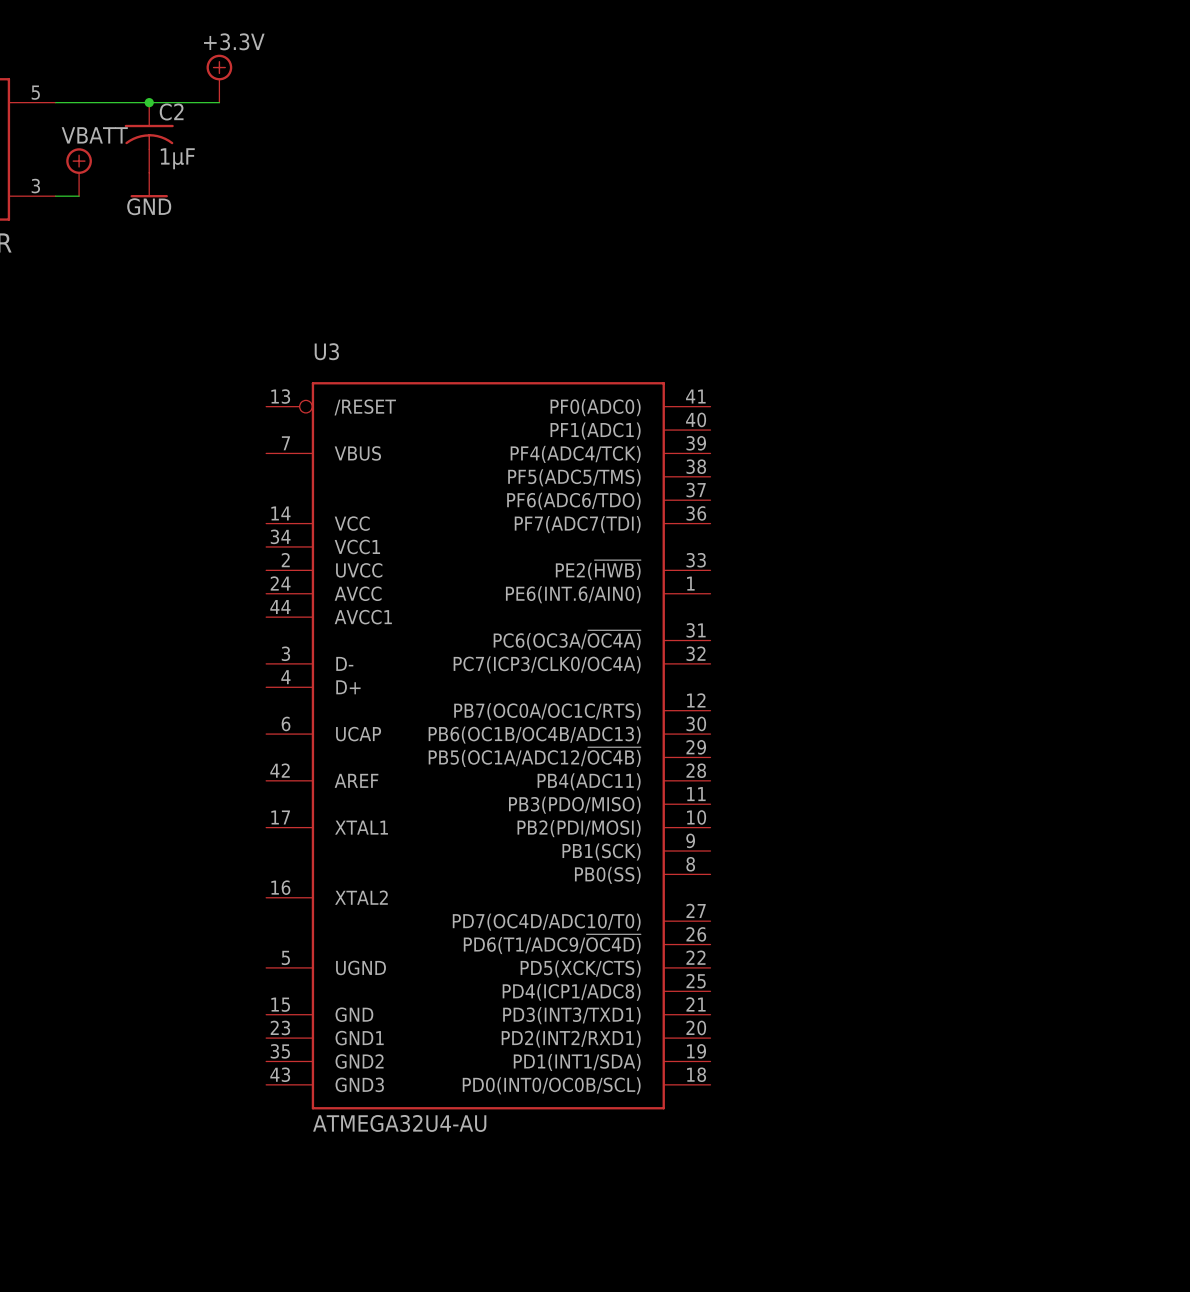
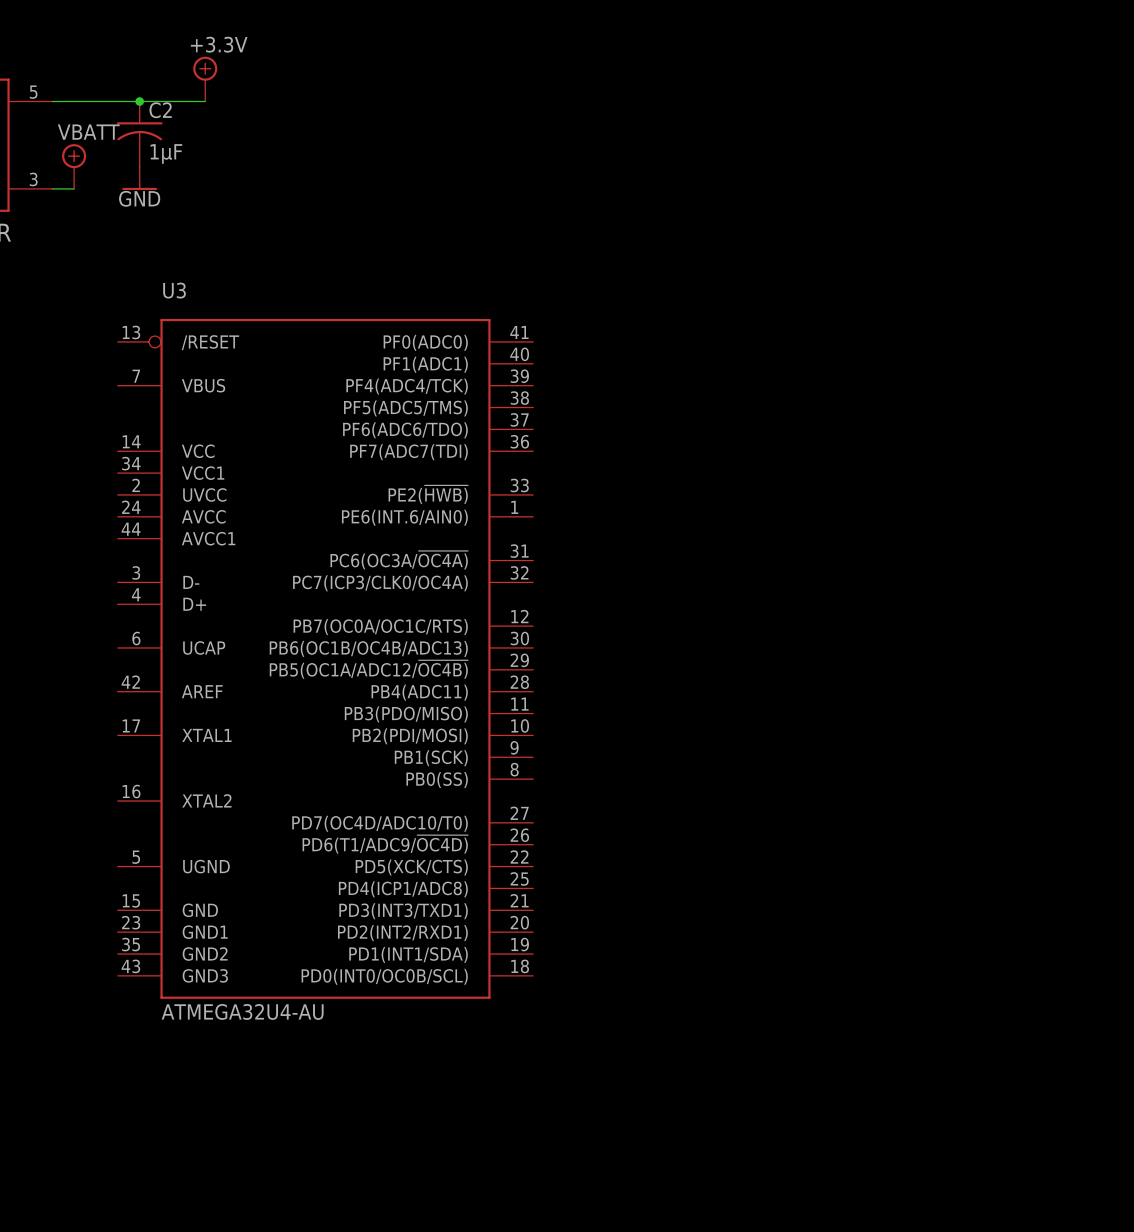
U3 position: (488, 745) -> (325, 658)

